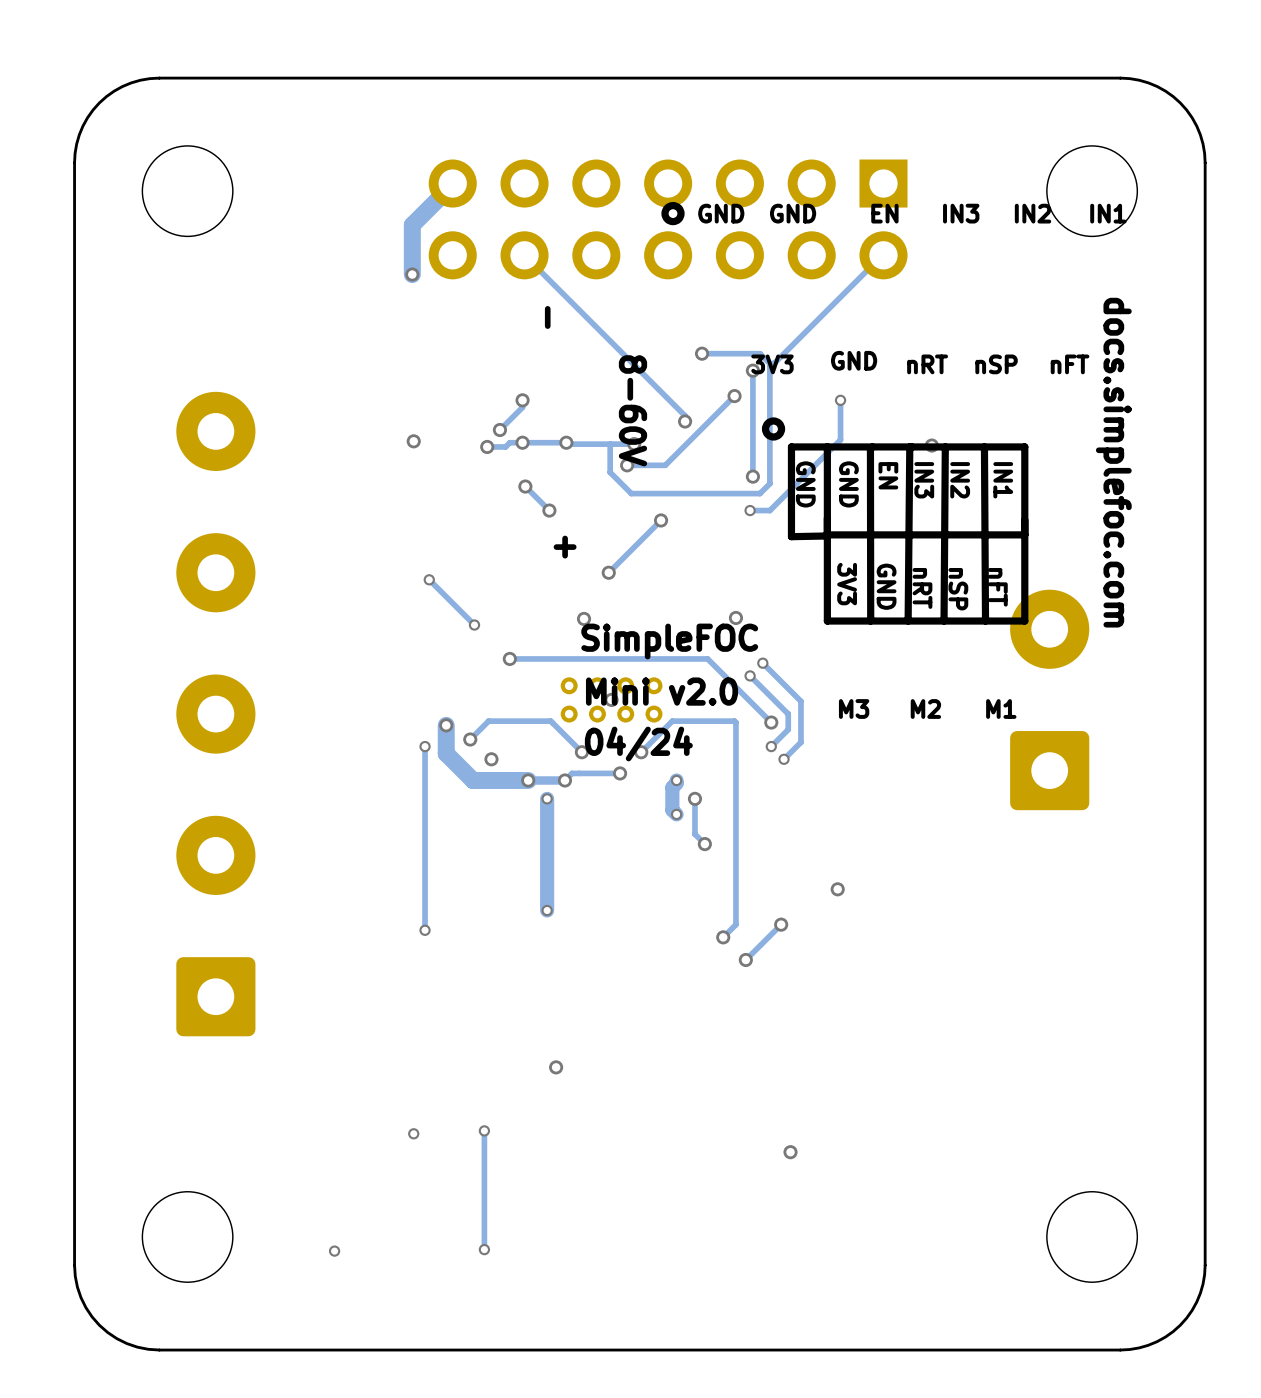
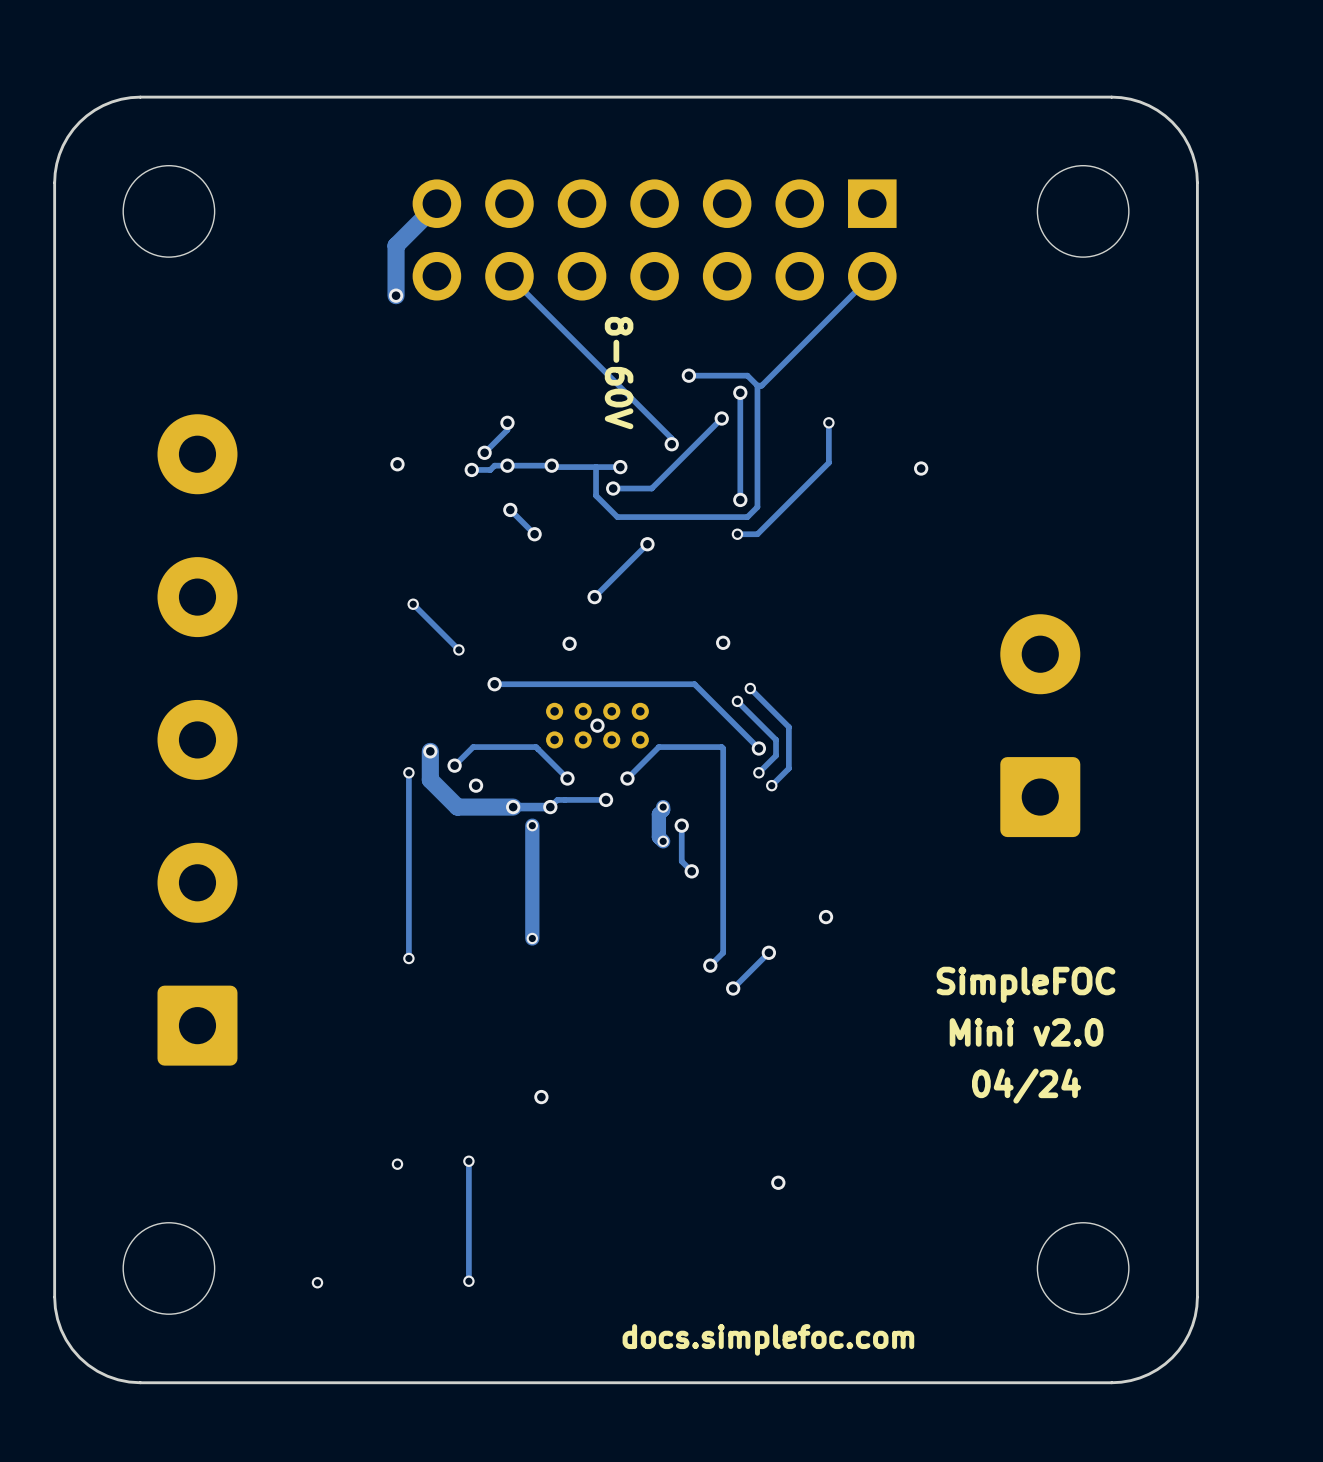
drawing: [661, 201, 685, 226] -> none
text: GND (721, 213) -> none
text: GND (793, 213) -> none
text: EN (884, 213) -> none
text: IN3 (961, 213) -> none
text: IN2 (1033, 213) -> none
text: IN1 (1108, 213) -> none
text: - (547, 317) -> none
text: GND (854, 360) -> none
text: 3V3 (772, 364) -> none
text: nRT (927, 364) -> none
text: nSP (996, 364) -> none
text: nFT (1070, 364) -> none
text position: 8-60V (632, 410) -> 8-60V (619, 373)
drawing: [761, 417, 786, 441] -> none
line: (827, 446) (827, 621) (1024, 621) (1024, 446) (791, 446) (791, 536) (827, 535) -> none
line: (872, 446) (870, 448) (870, 621) -> none
line: (909, 446) (908, 621) -> none
line: (945, 446) (944, 621) -> none
line: (984, 446) (985, 621) -> none
text: docs.simplefoc.com (1113, 462) -> none
text: EN (888, 475) -> none
text: IN3 (924, 480) -> none
text: IN2 (960, 480) -> none
text: IN1 (1003, 480) -> none
text: GND (805, 484) -> none
text: GND (848, 484) -> none
line: (1024, 534) (827, 534) -> none
text: + (565, 547) -> none
text: 3V3 (847, 584) -> none
text: GND (886, 586) -> none
text: nFT (997, 587) -> none
text: nRT (922, 588) -> none
text: nSP (958, 589) -> none
text position: SimpleFOC (669, 641) -> SimpleFOC (1026, 984)
text position: Mini v2.0 (662, 691) -> Mini v2.0 (1026, 1032)
text: M3 (854, 709) -> none
text: M2 (925, 709) -> none
text: M1 (1001, 709) -> none
text position: 04/24 (638, 743) -> 04/24 (1026, 1086)
text: none -> docs.simplefoc.com (768, 1339)

